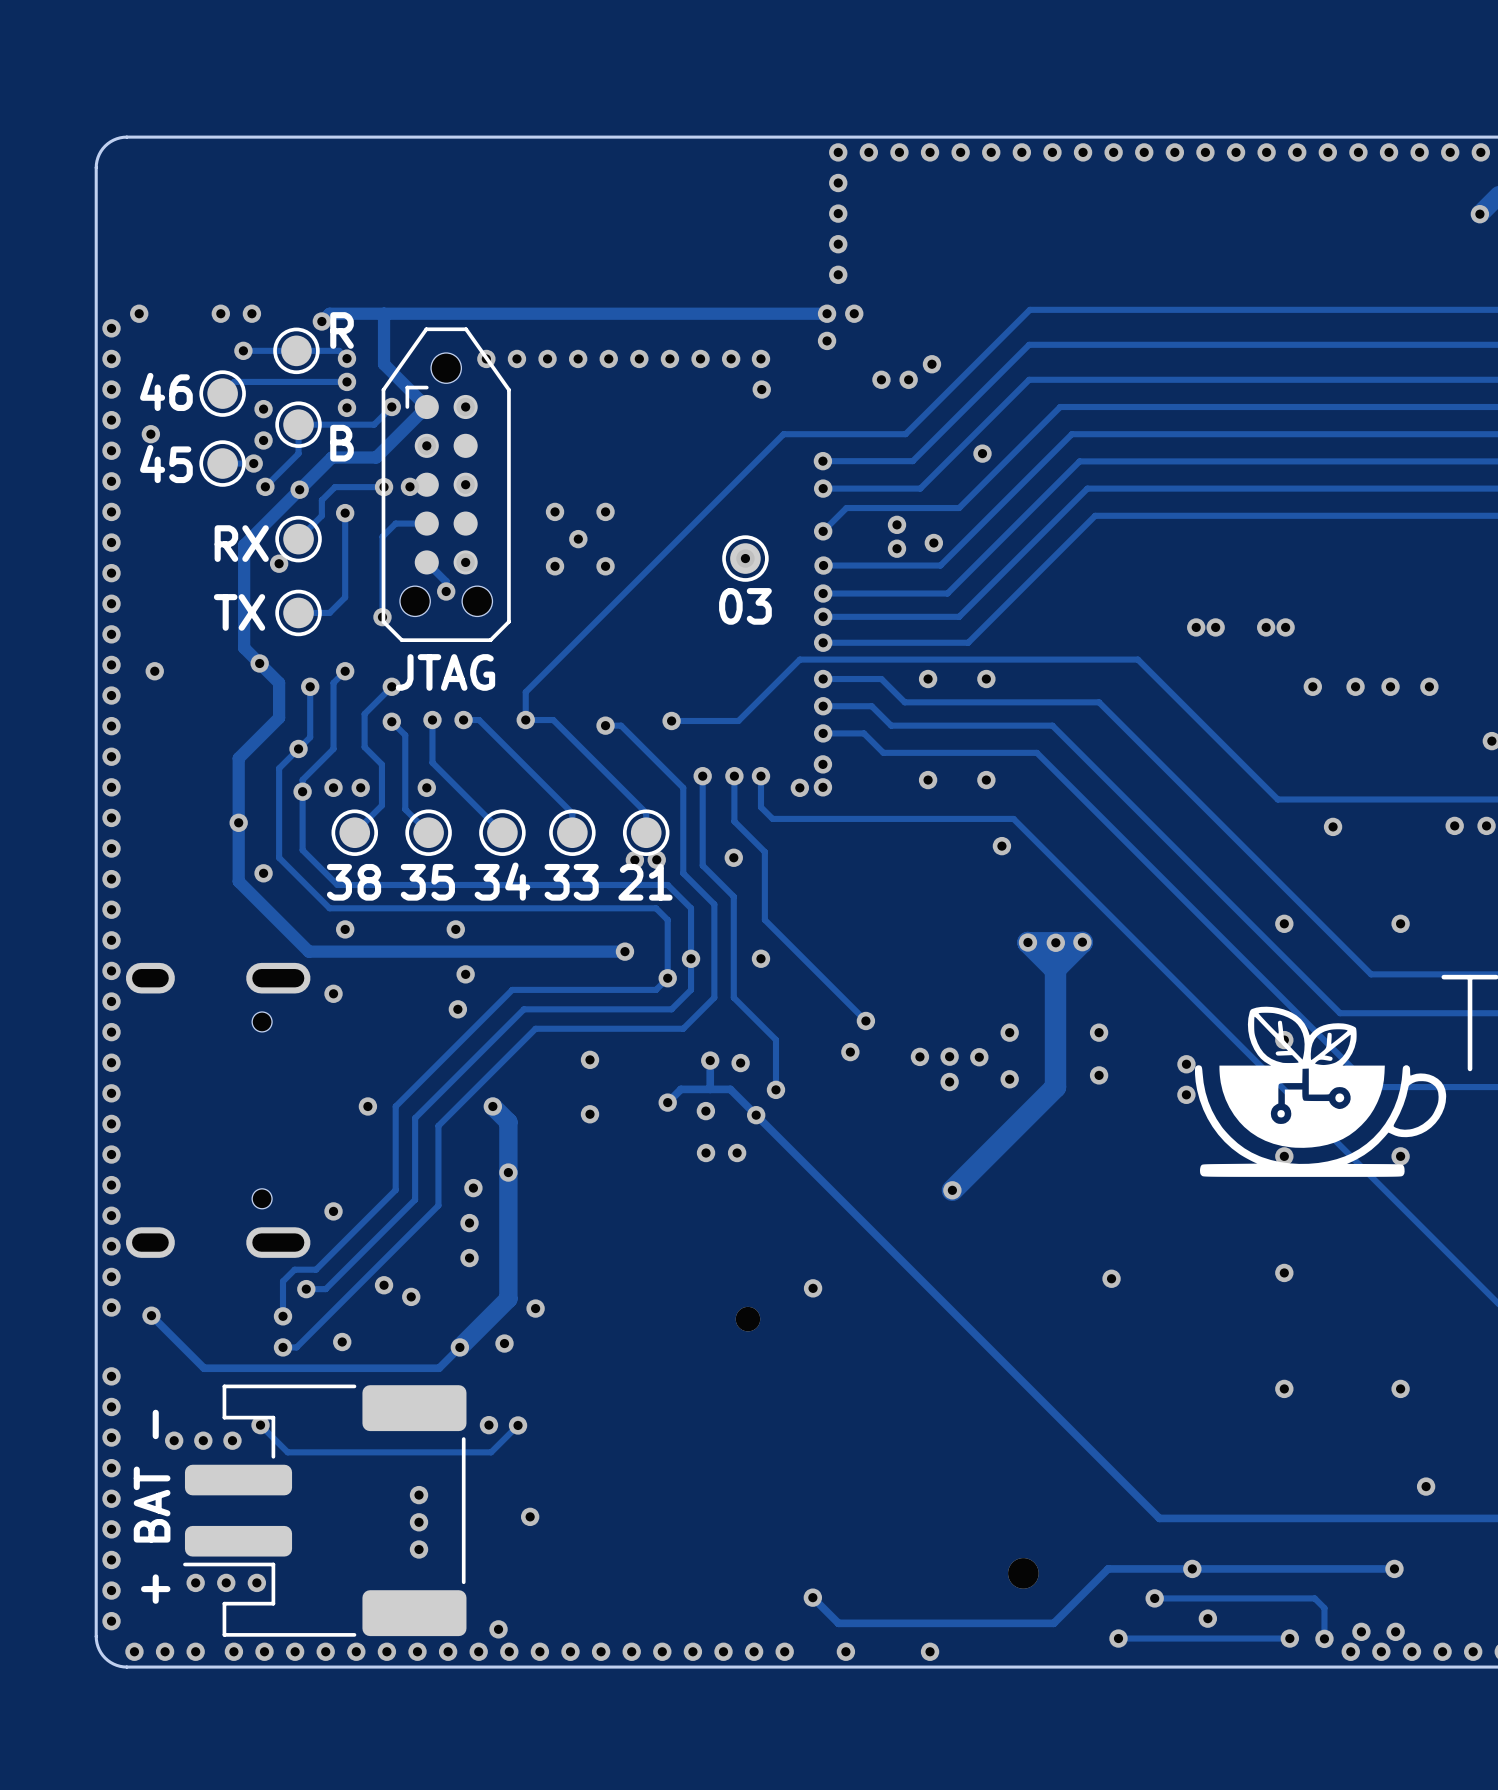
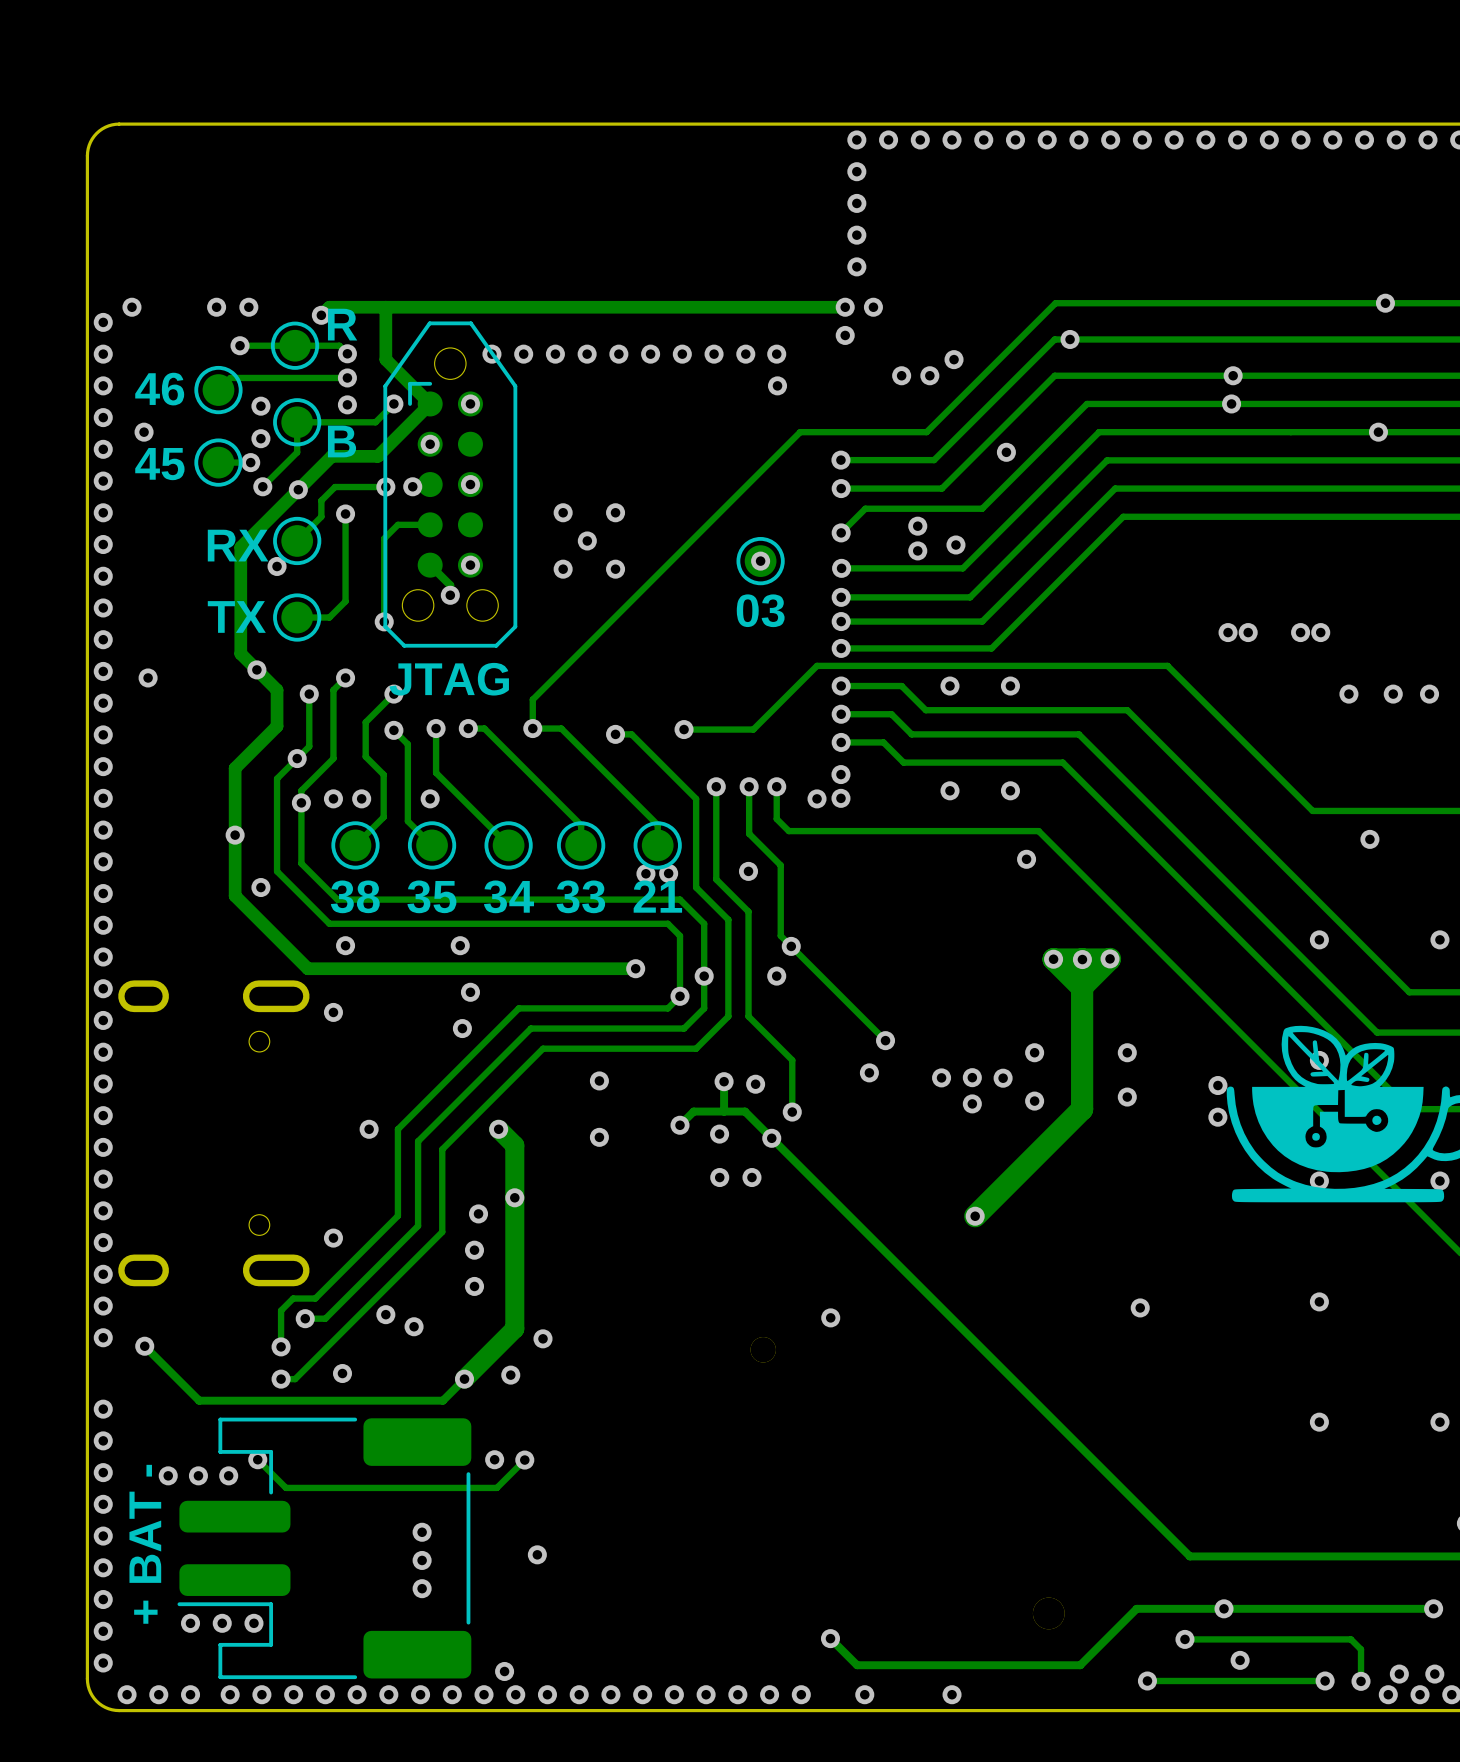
via: none -> (1385, 303)
via: none -> (1070, 339)
via: none -> (1233, 375)
via: none -> (1231, 403)
via: none -> (1378, 432)
via: none -> (791, 946)

